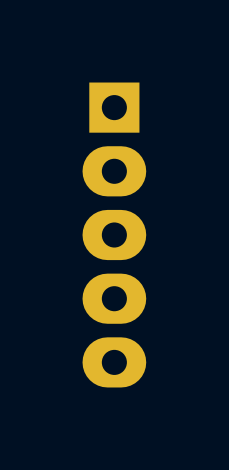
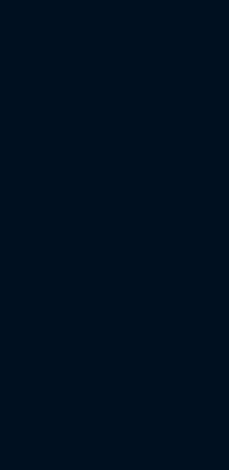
part: (114, 235) -> none

